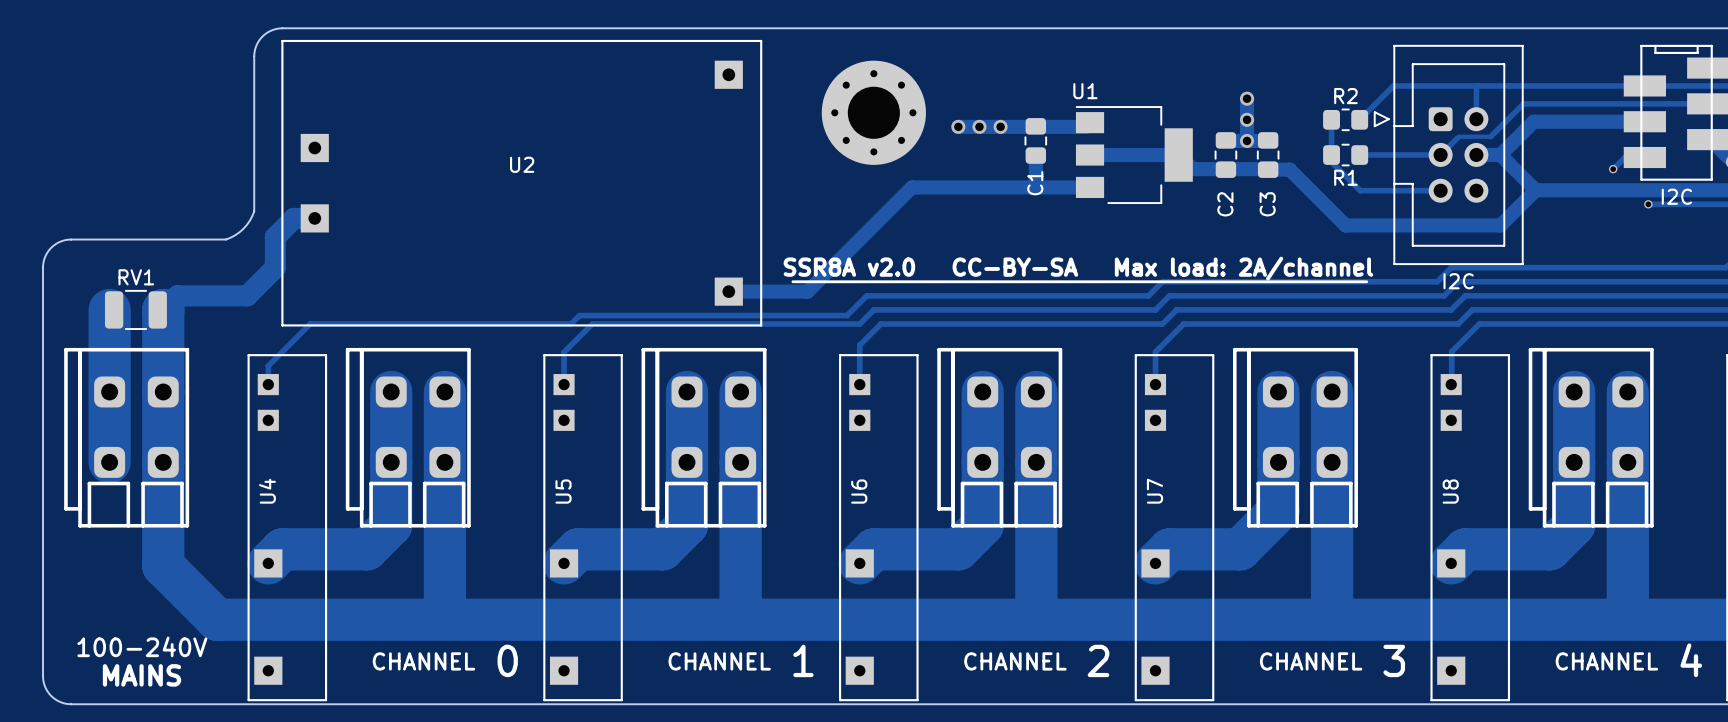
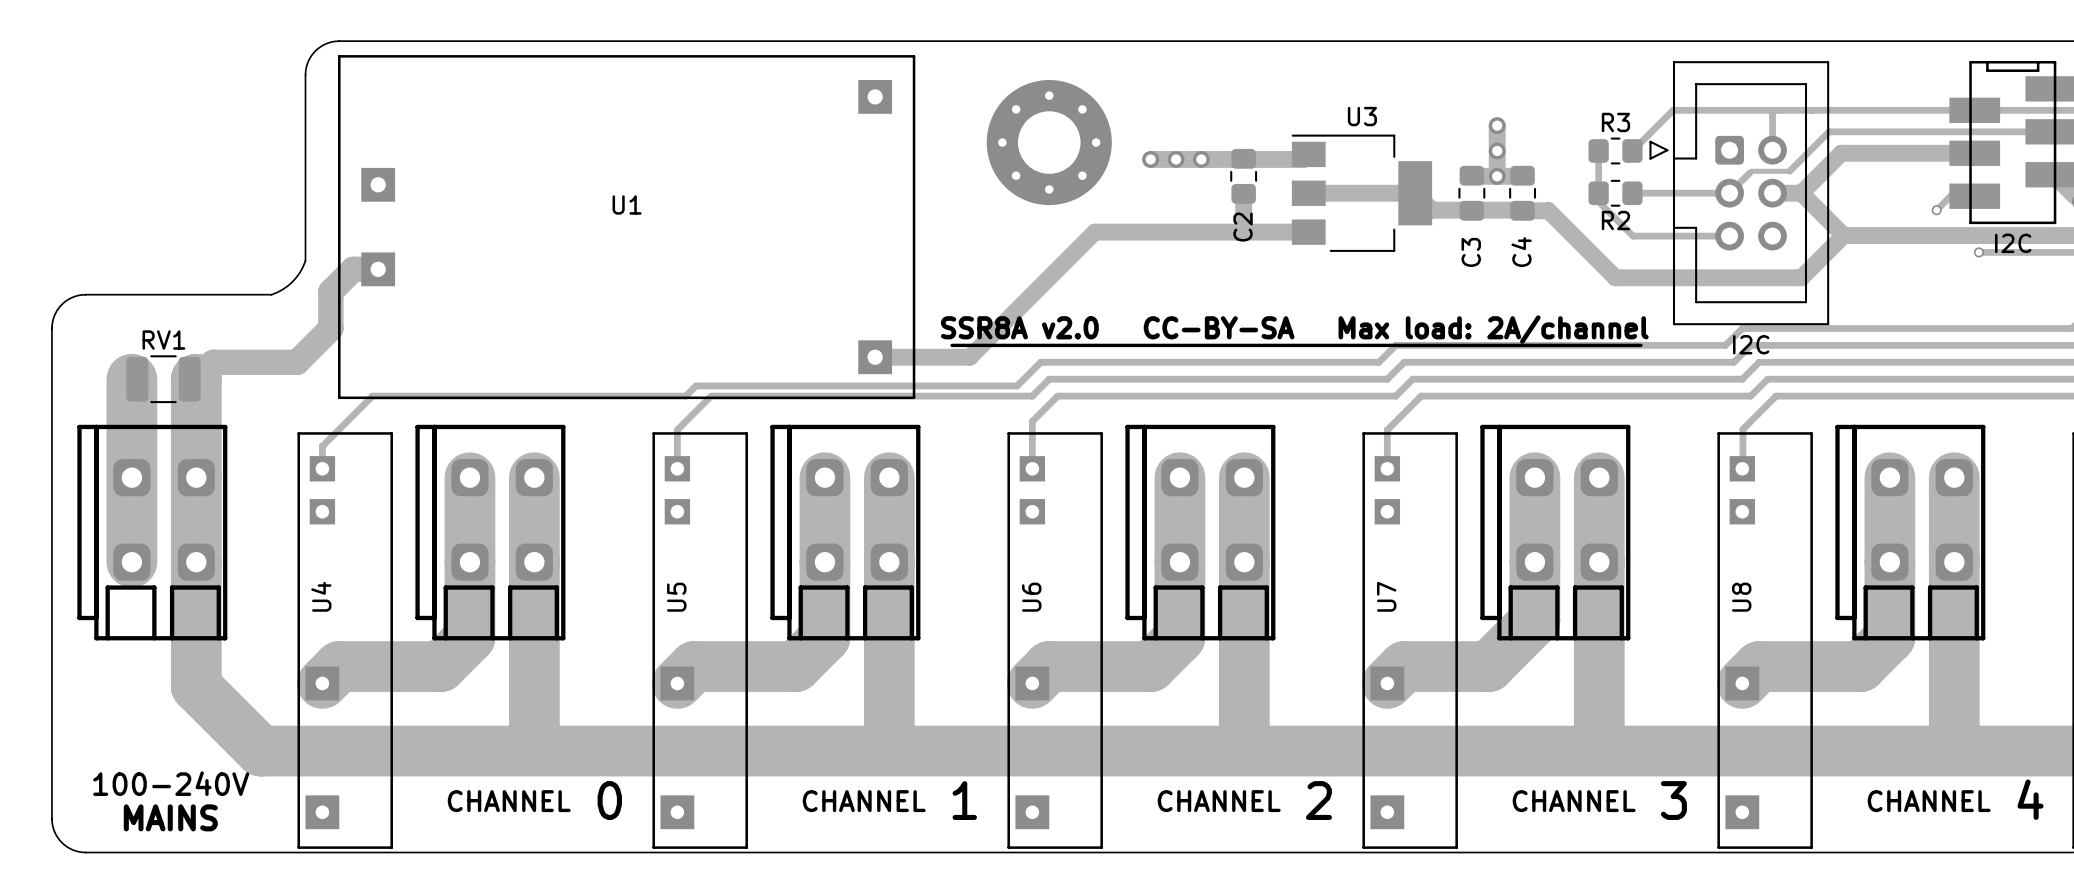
U1 name: U1 (1085, 91) -> U3 (1362, 116)
R2 name: R2 (1345, 96) -> R3 (1615, 122)
U2 name: U2 (522, 164) -> U1 (627, 204)
R1 name: R1 (1345, 177) -> R2 (1615, 220)
C1 name: C1 (1035, 183) -> C2 (1243, 227)
C2 name: C2 (1225, 204) -> C3 (1471, 252)
C3 name: C3 (1267, 204) -> C4 (1521, 252)

